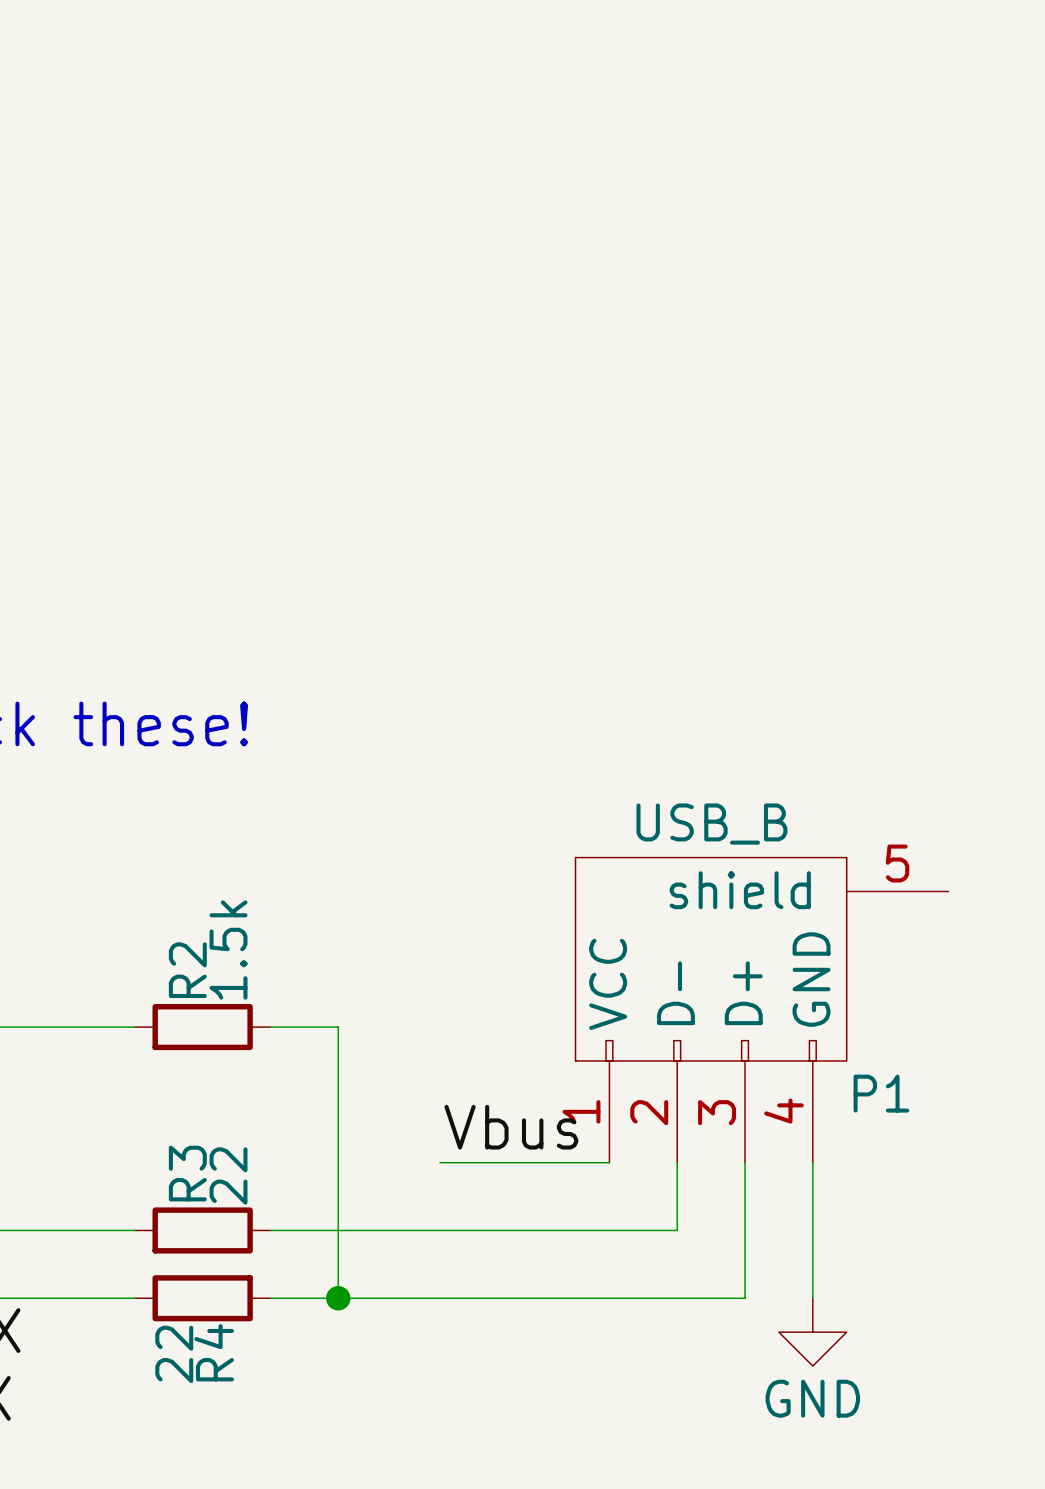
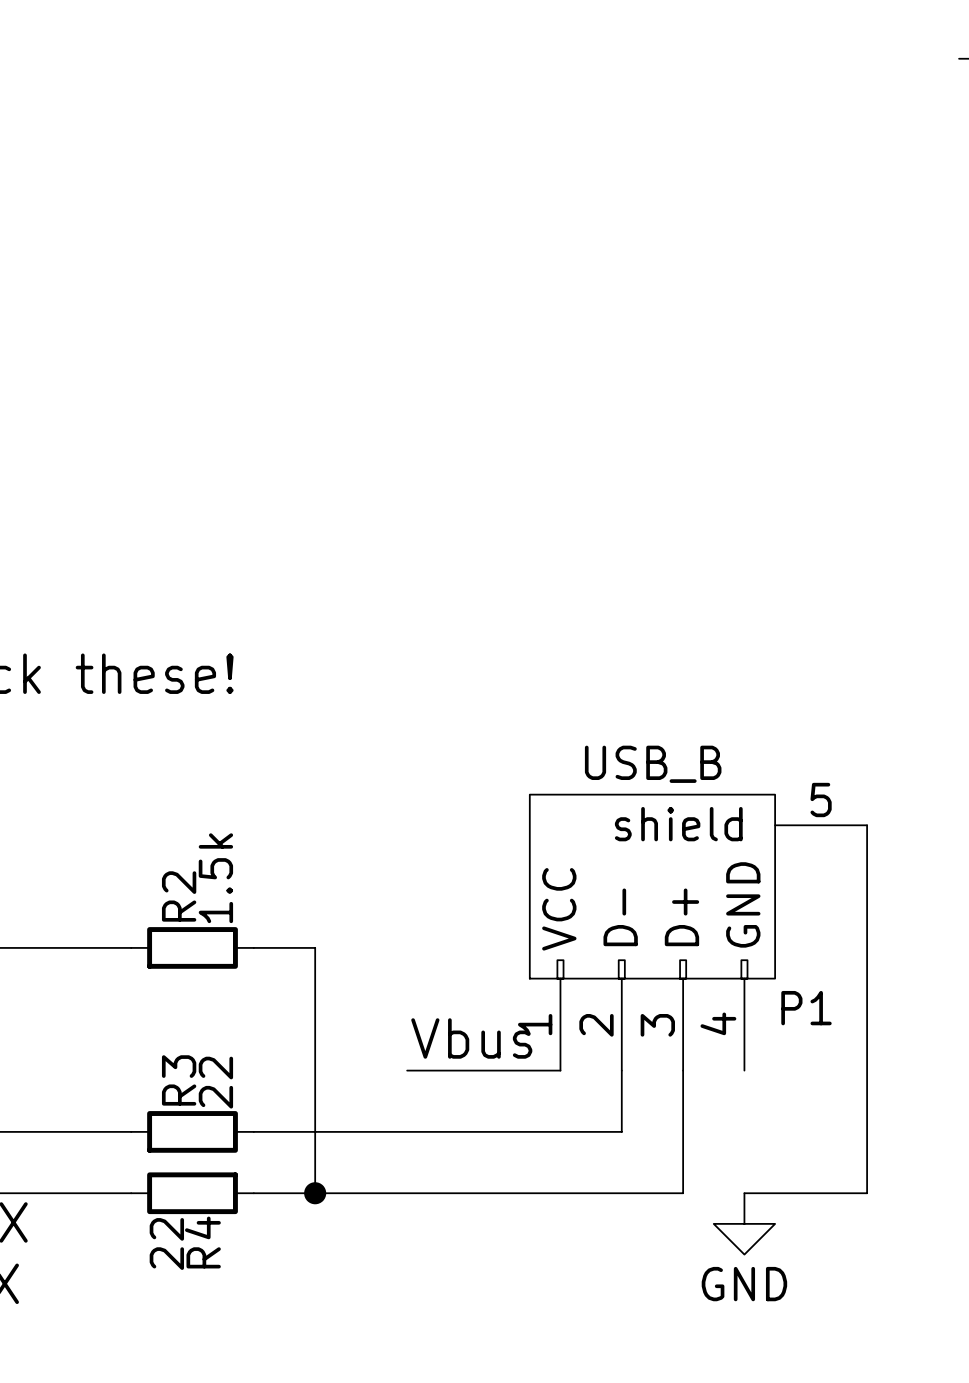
wire: (812, 1162) (812, 1298) -> (867, 825) (867, 1193) (744, 1193)

